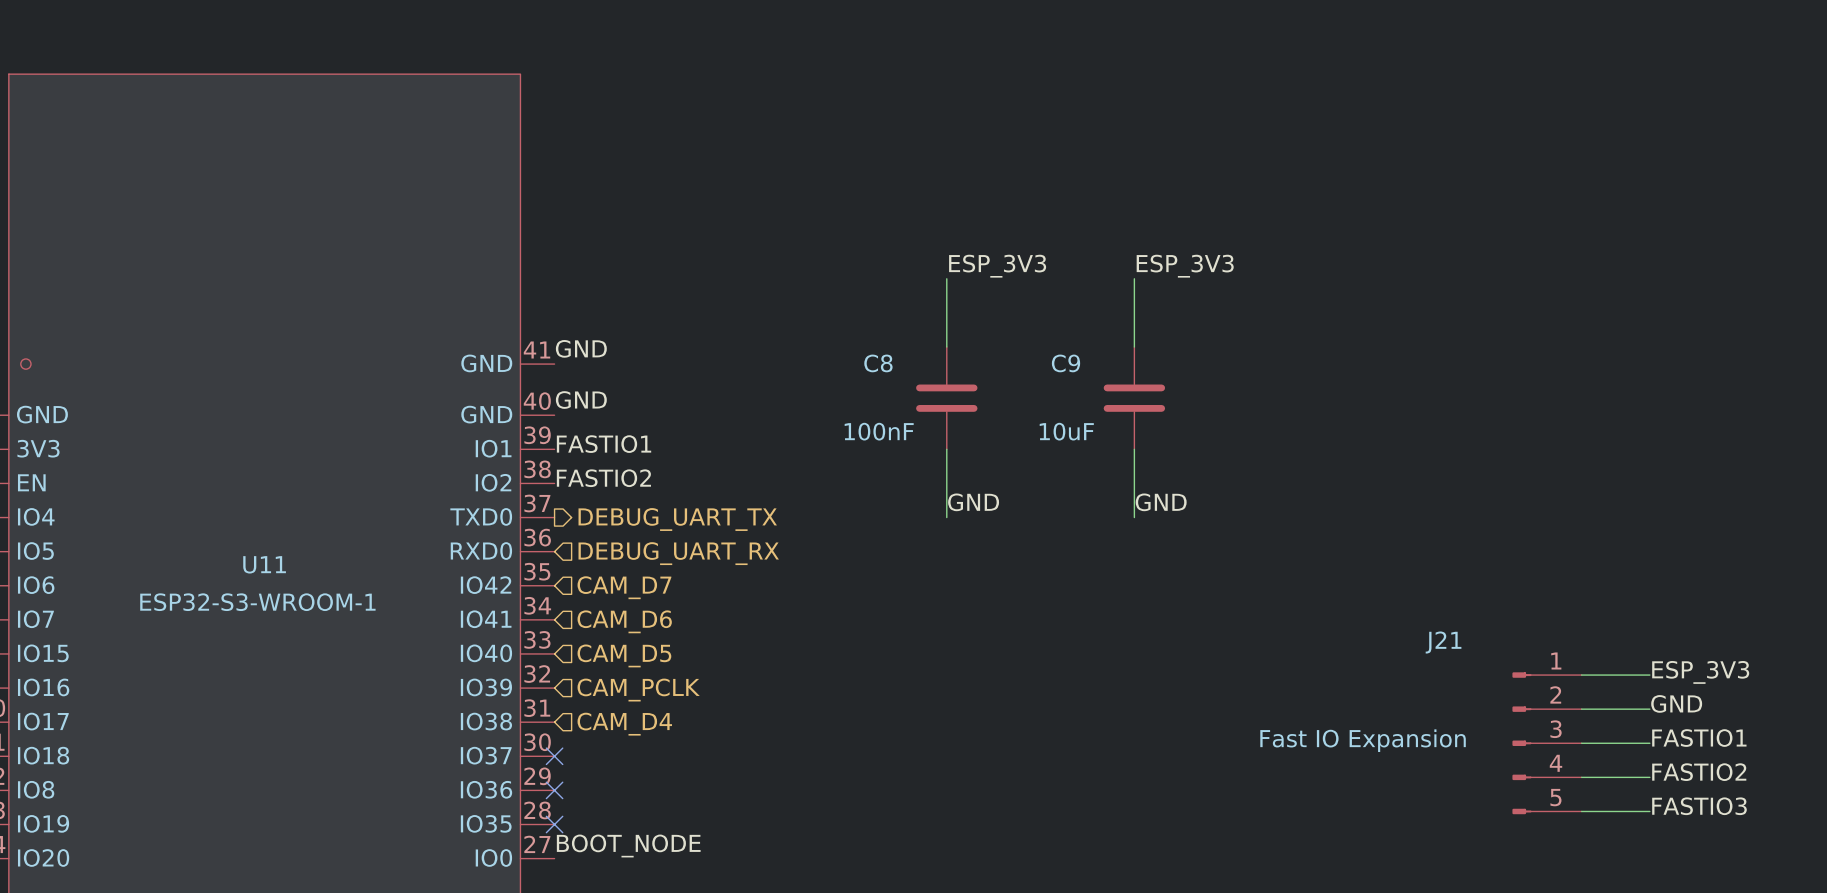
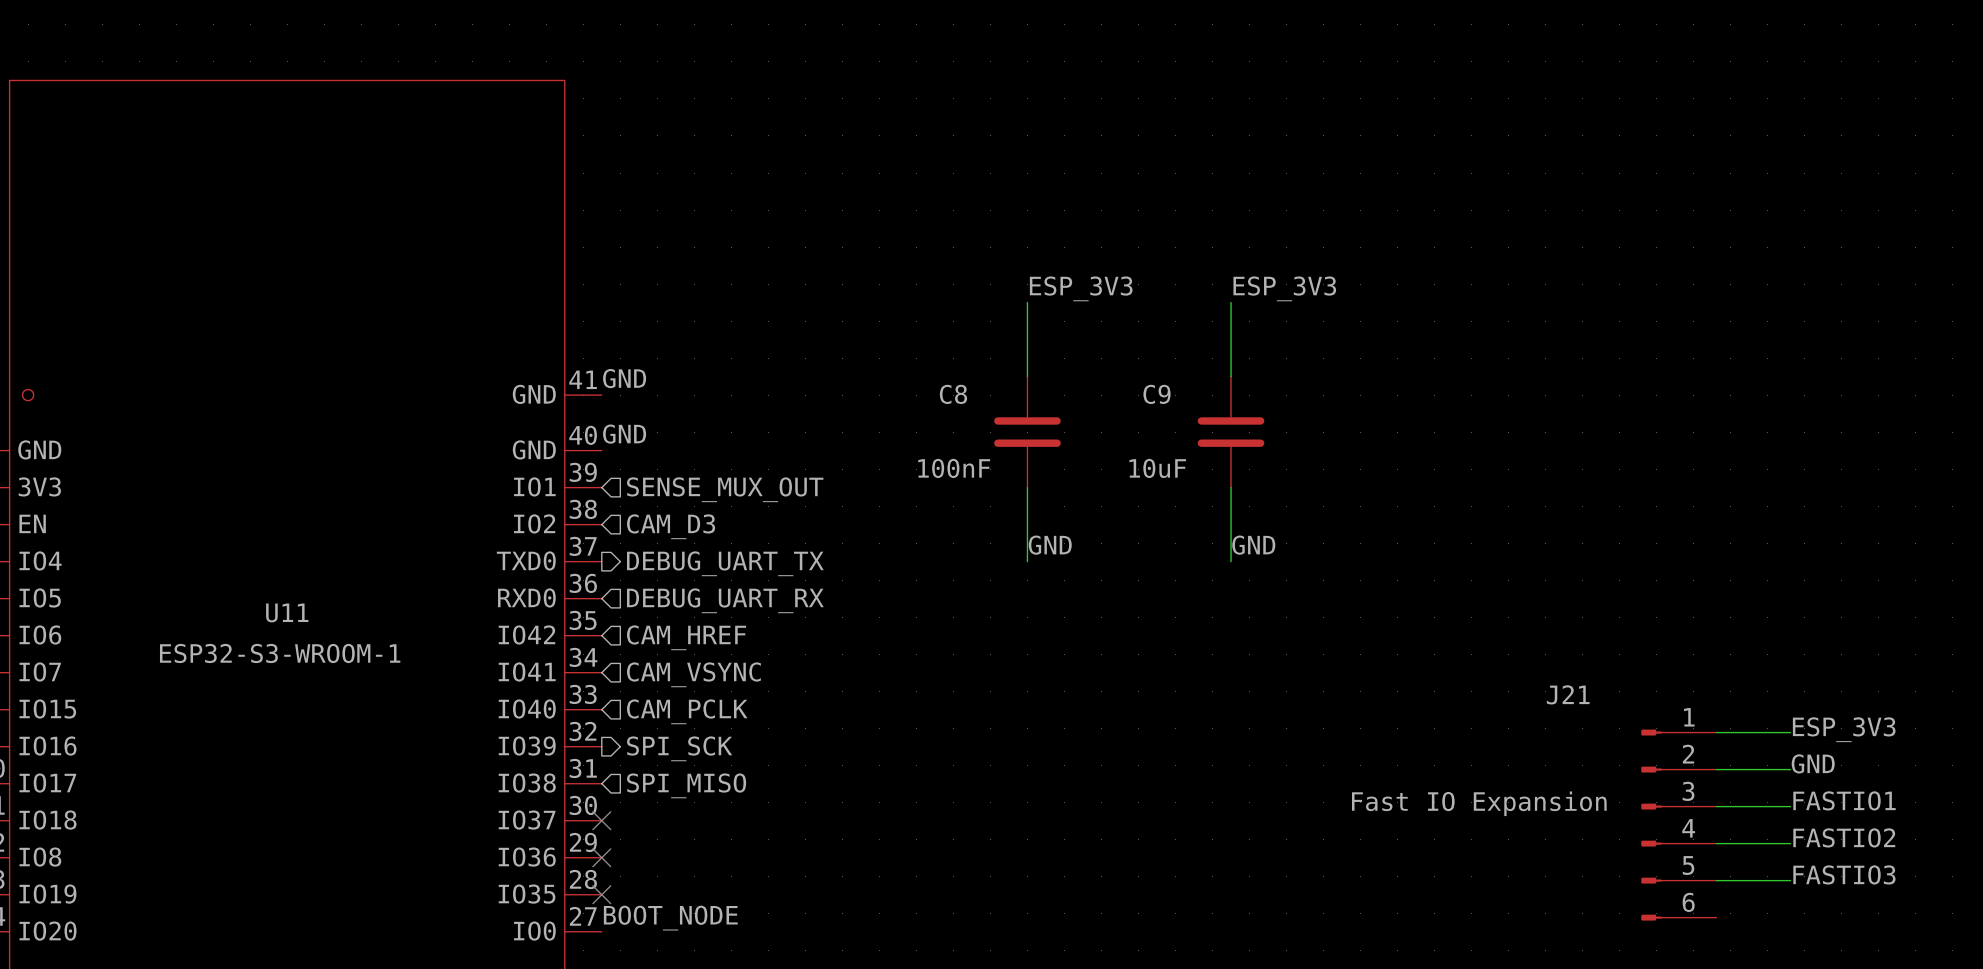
label: FASTIO1 (604, 444) -> none
hierarchical label: none -> SENSE_MUX_OUT (725, 489)
label: FASTIO2 (603, 478) -> none
hierarchical label: none -> CAM_D3 (671, 526)
hierarchical label: CAM_D7 (624, 587) -> CAM_HREF (686, 637)
hierarchical label: CAM_D6 (624, 621) -> CAM_VSYNC (693, 674)
hierarchical label: CAM_D5 (624, 655) -> CAM_PCLK (687, 711)
J21 symbol: [1512, 672, 1582, 815] -> [1641, 729, 1717, 921]
hierarchical label shape: input (638, 690) -> output (679, 748)
hierarchical label: CAM_PCLK (638, 690) -> SPI_SCK (679, 748)
hierarchical label: CAM_D4 (624, 724) -> SPI_MISO (686, 785)

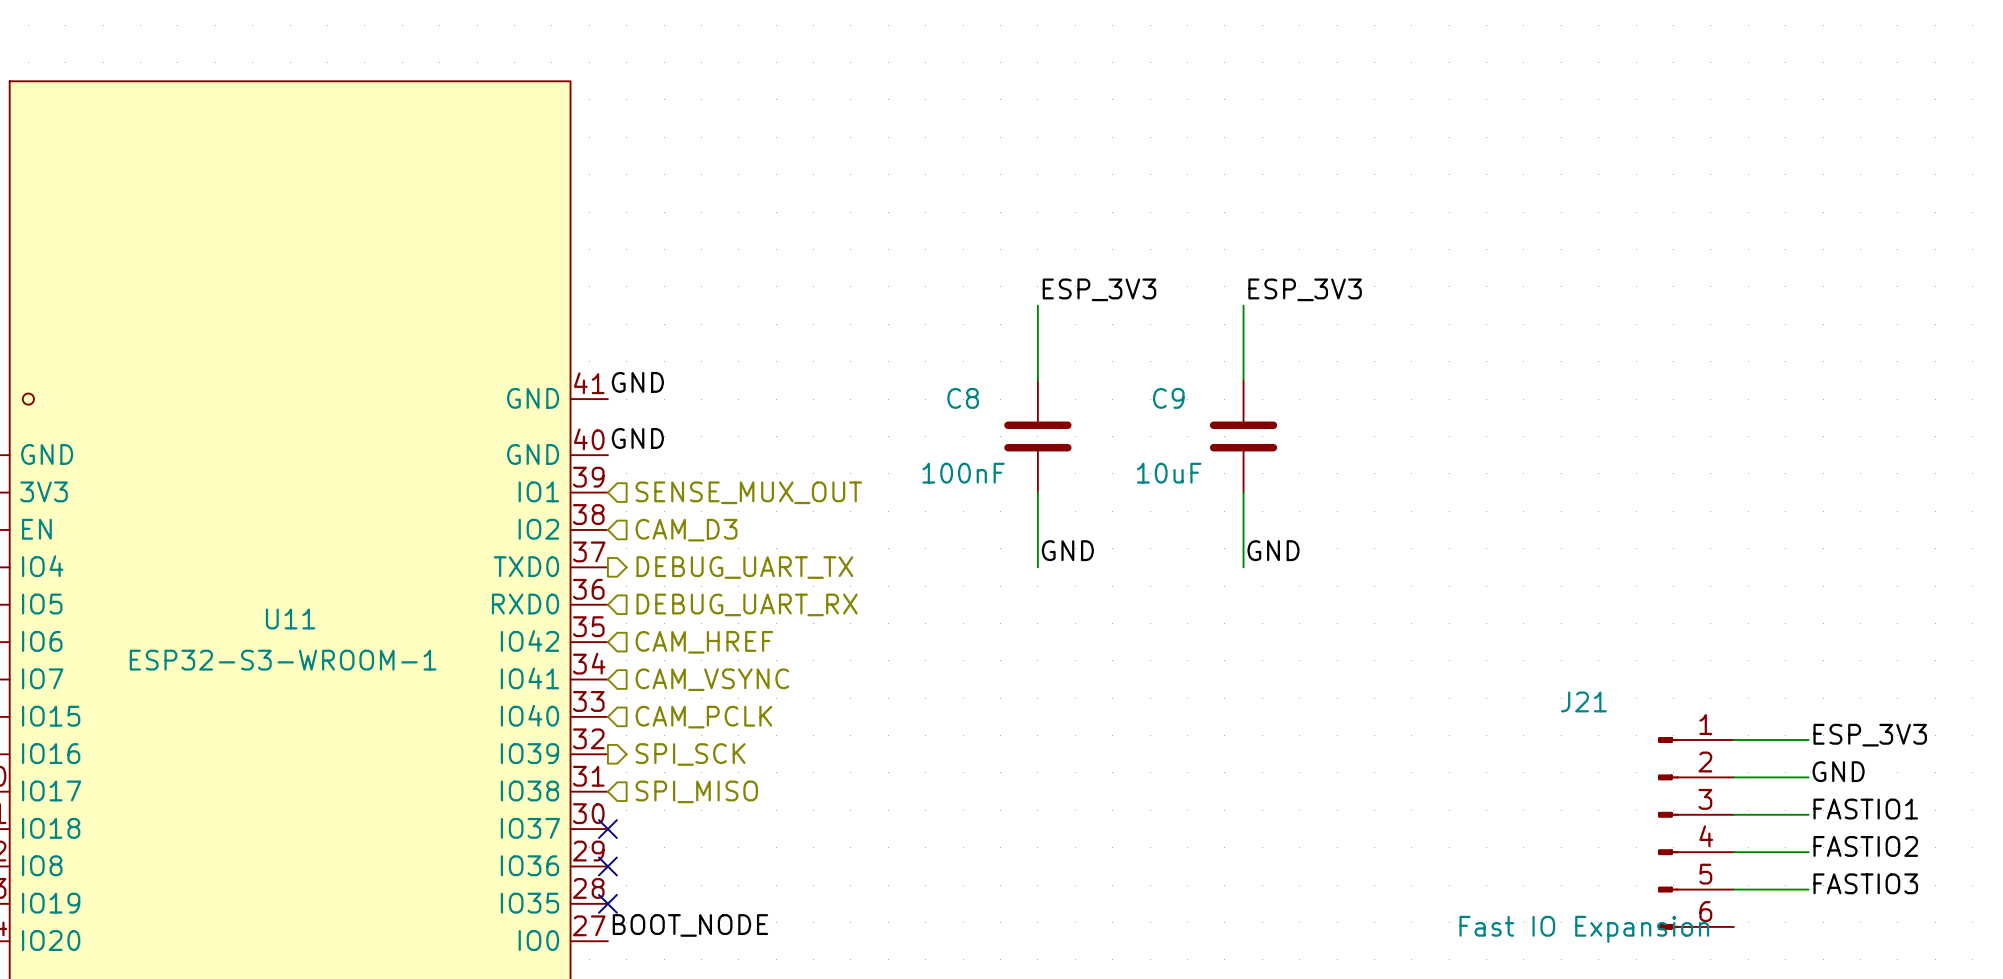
J21 value position: Fast IO Expansion (1479, 803) -> Fast IO Expansion (1584, 929)

